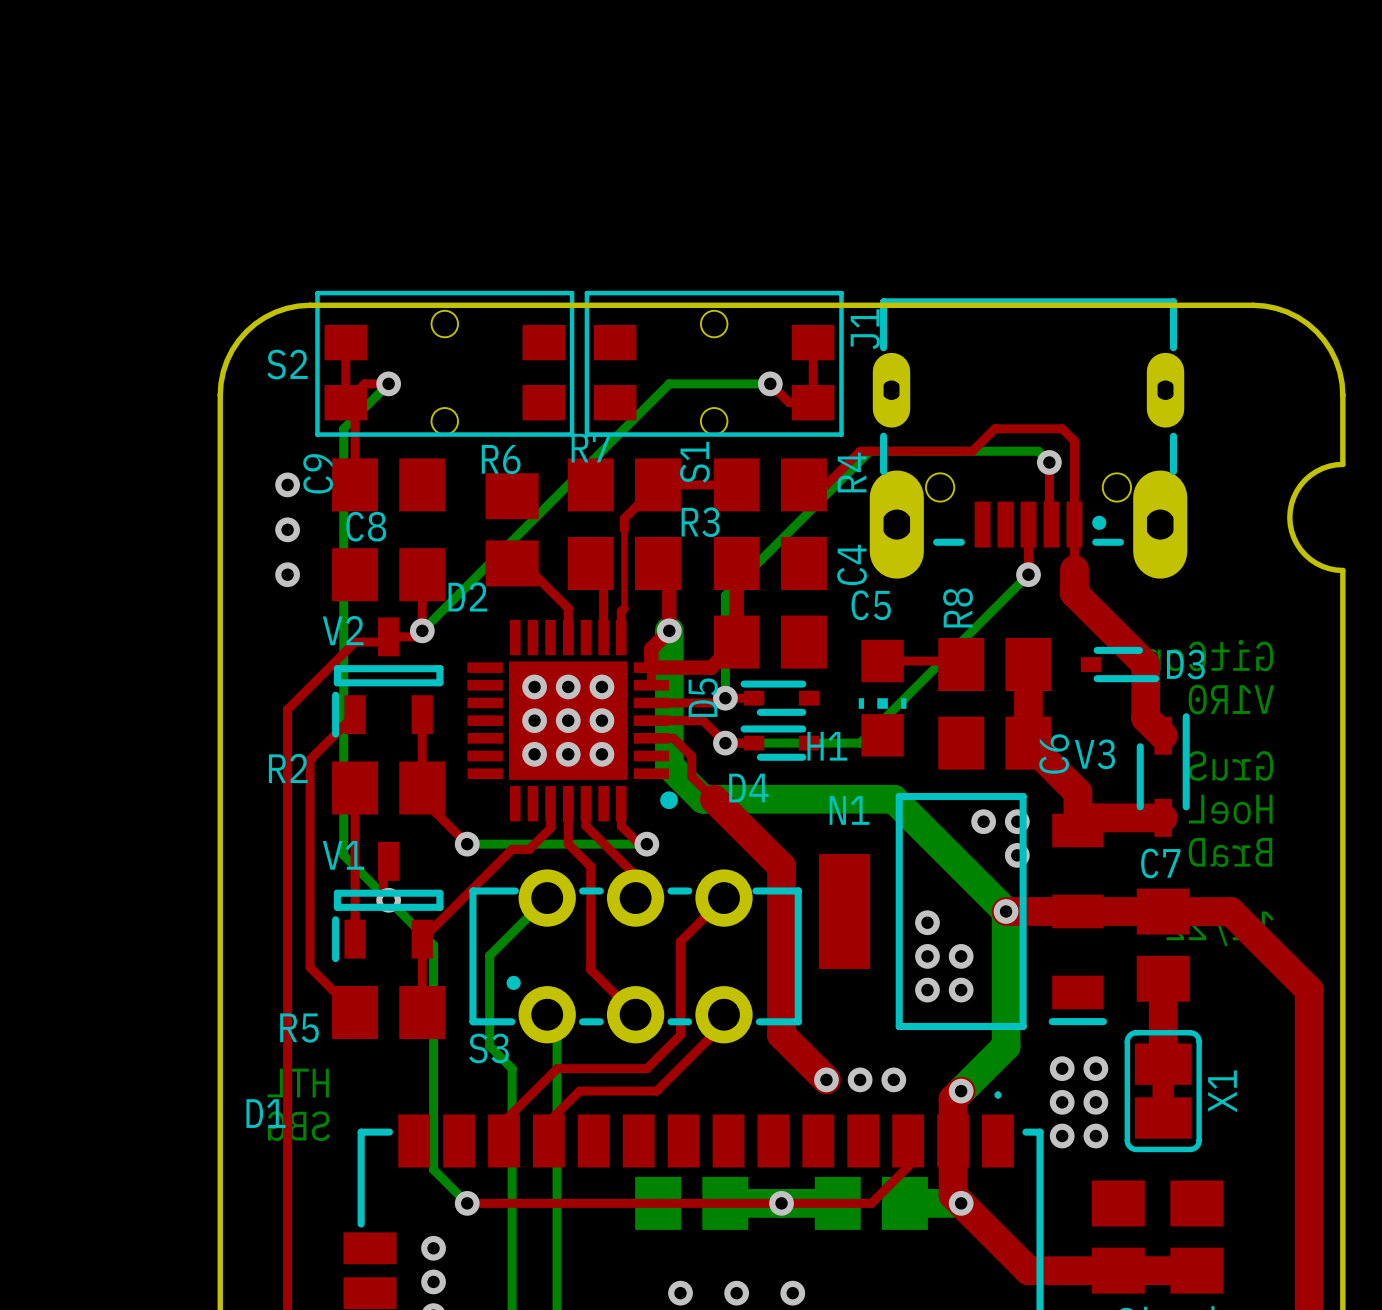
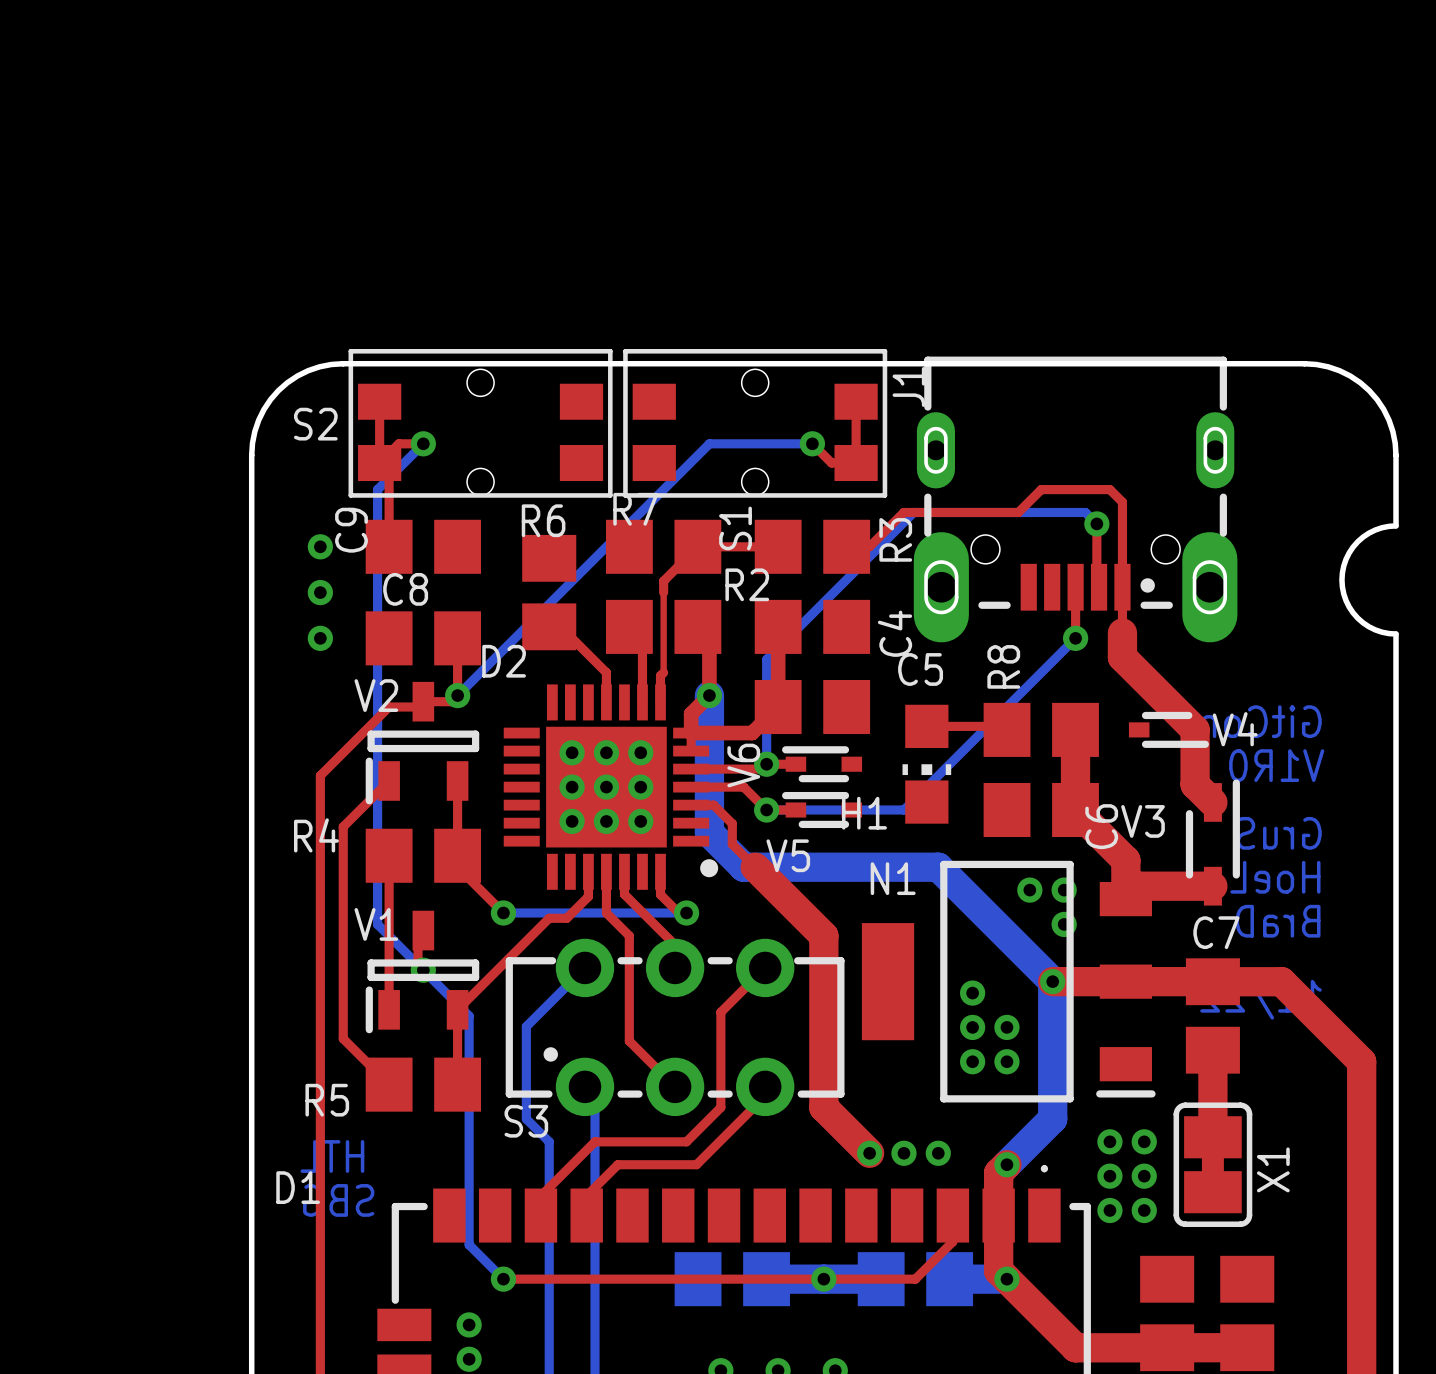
R4 name: R4 (852, 472) -> R3 (895, 539)
R3 name: R3 (700, 522) -> R2 (747, 584)
D3 name: D3 (1185, 664) -> V4 (1235, 729)
D5 name: D5 (703, 697) -> V6 (743, 765)
R2 name: R2 (288, 768) -> R4 (316, 835)
D4 name: D4 (748, 788) -> V5 (788, 855)

